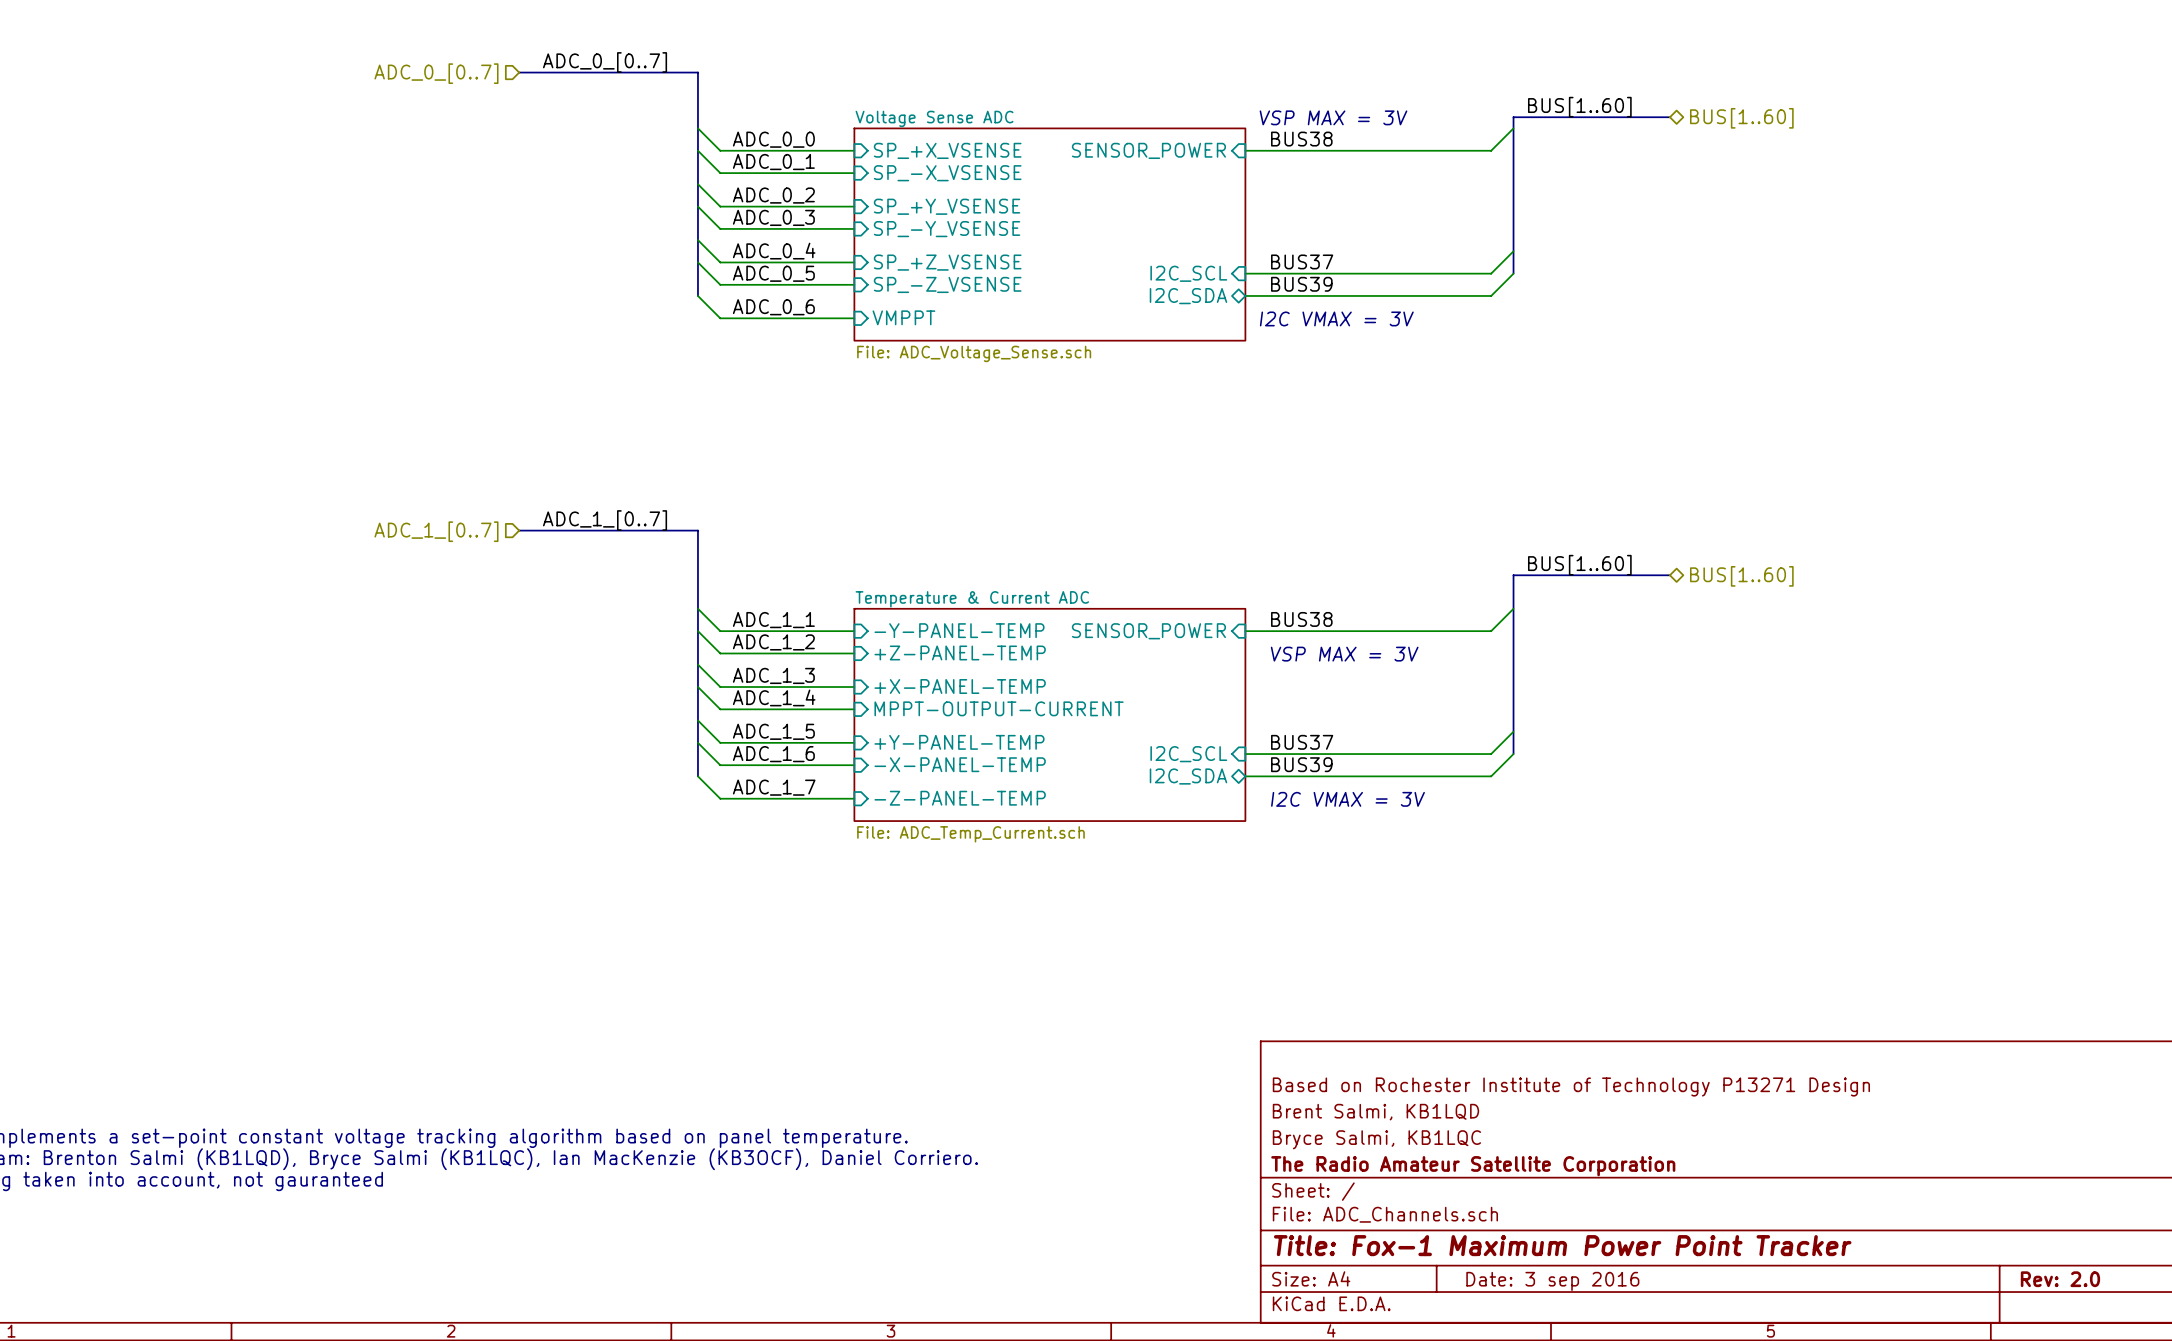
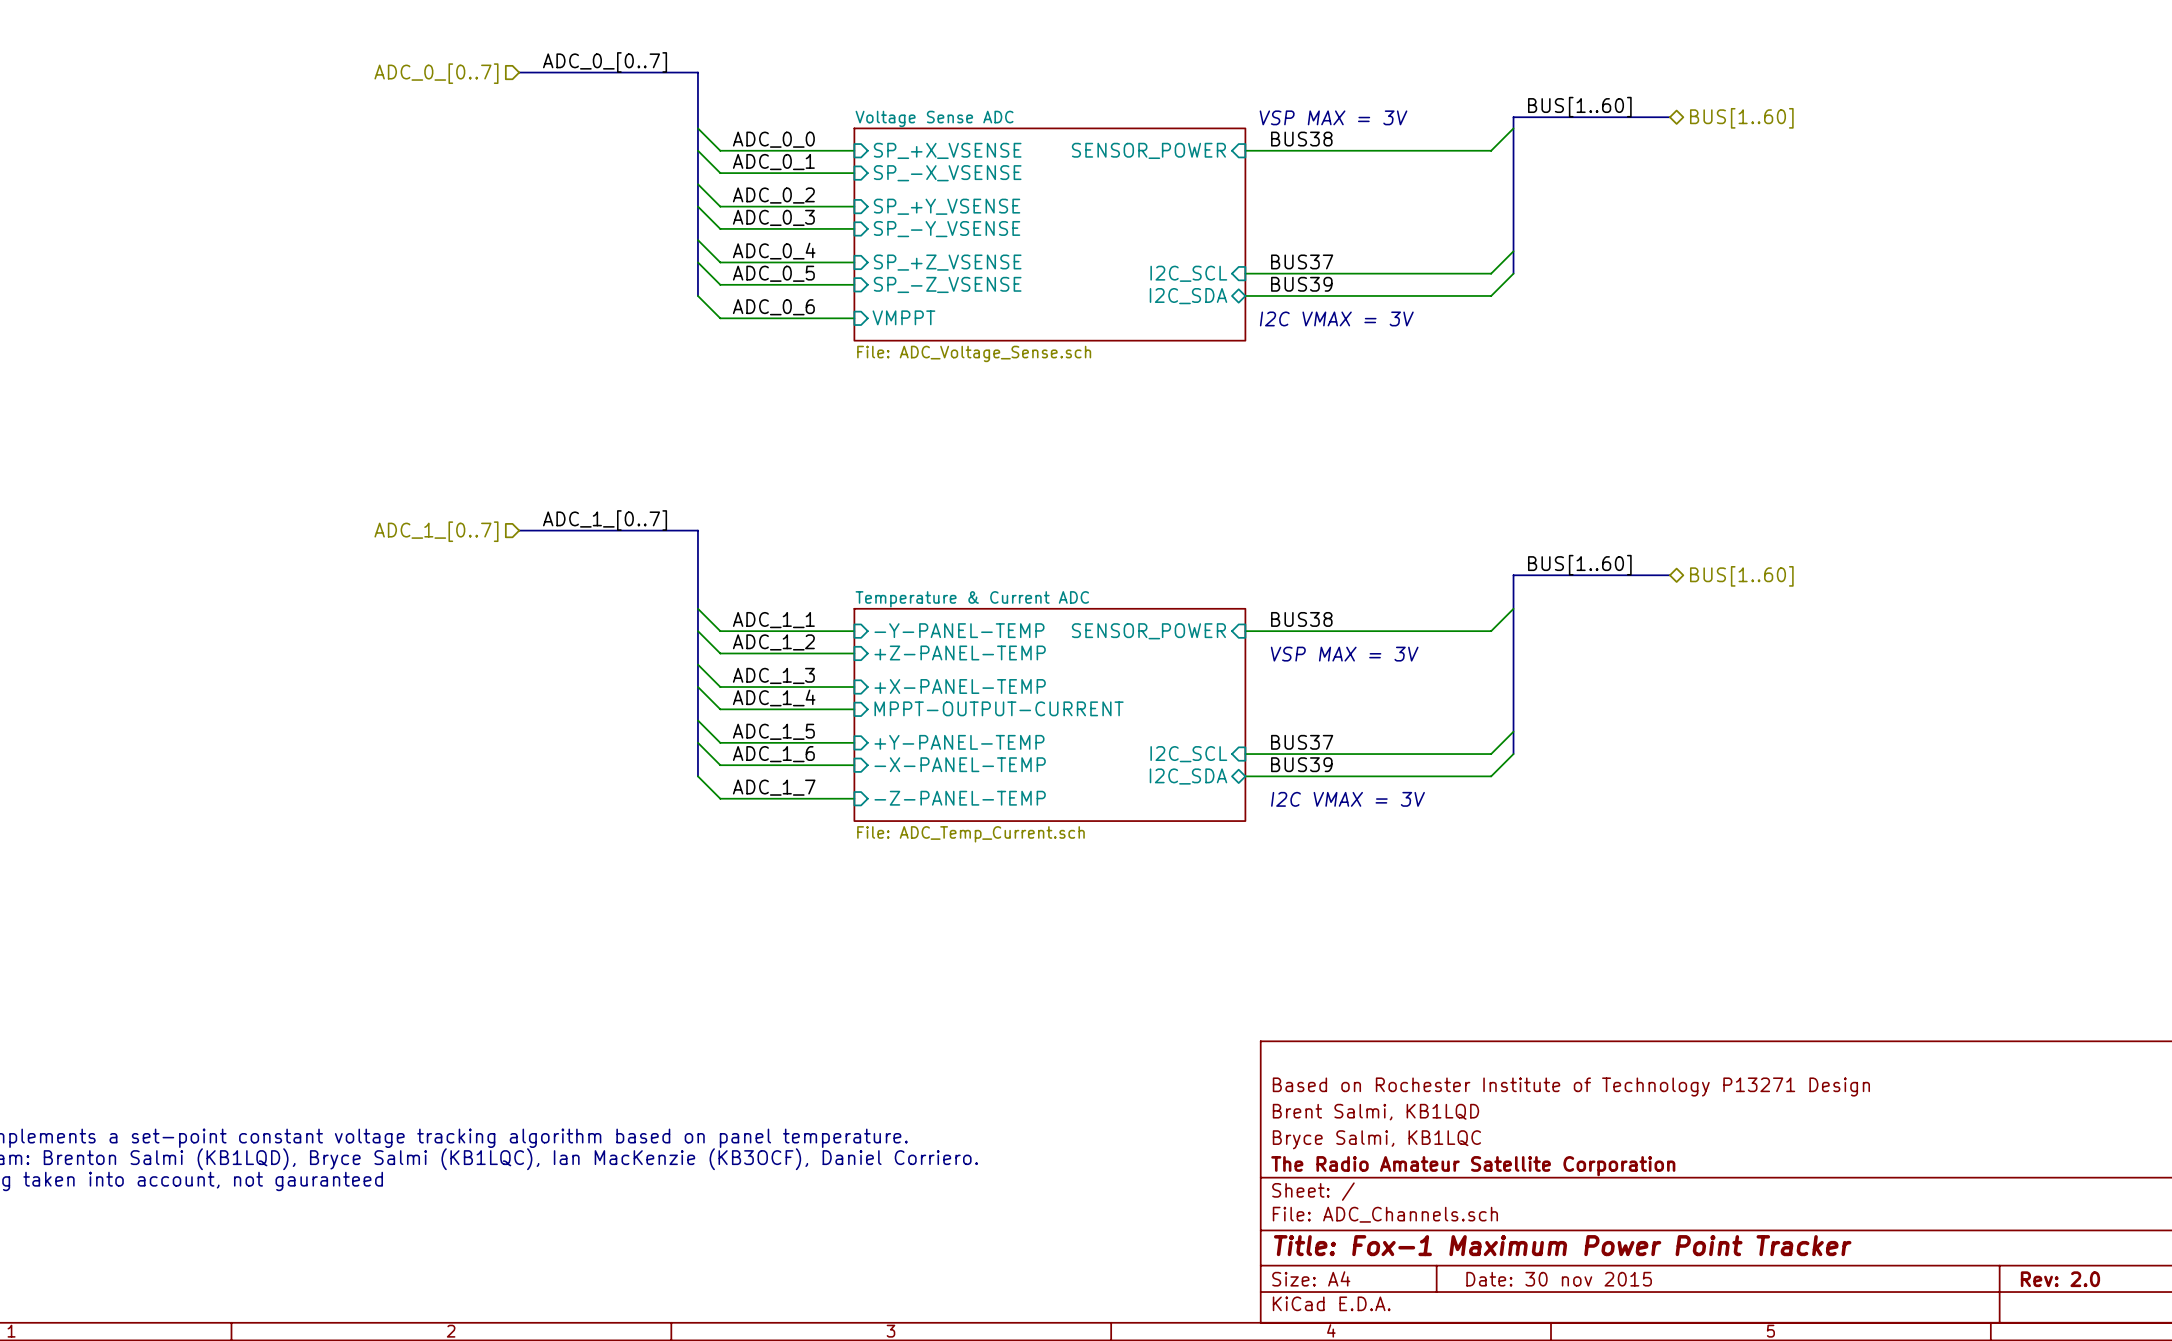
title block: Date: 3 sep 2016 (1552, 1281) -> Date: 30 nov 2015 (1559, 1279)

